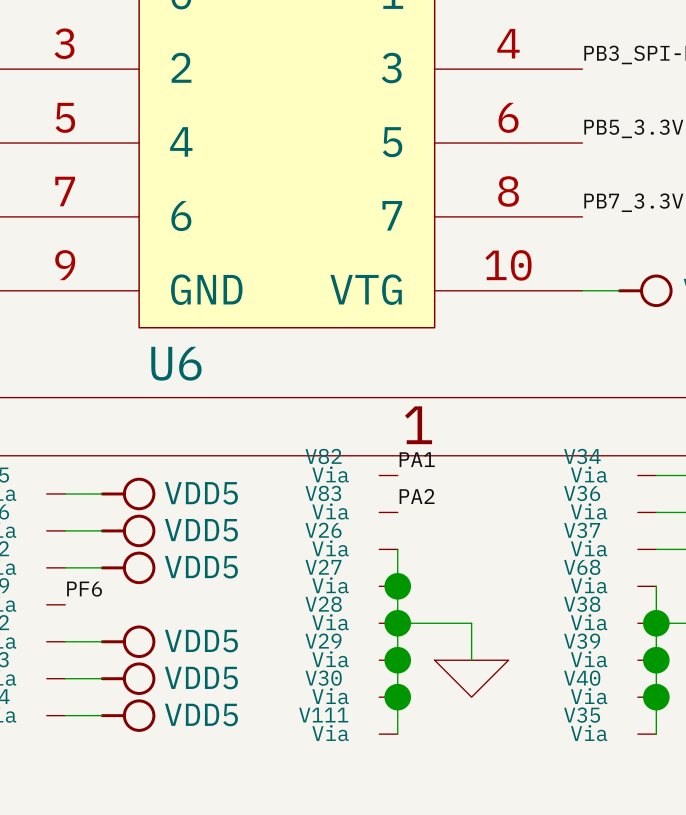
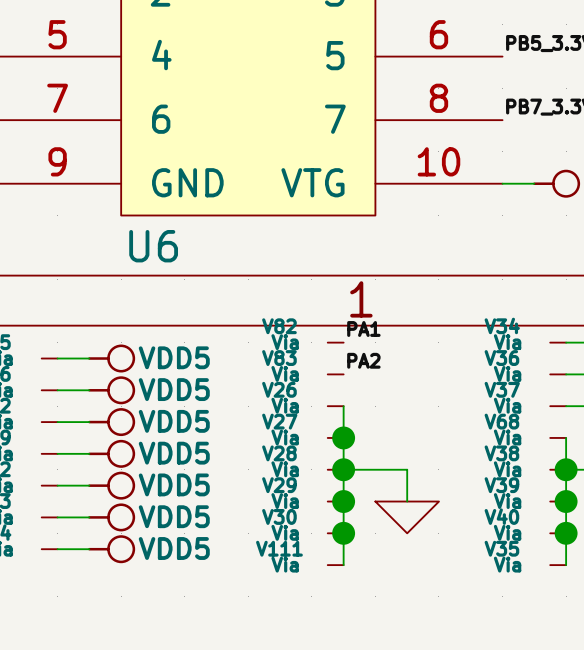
label: PF6 (84, 589) -> none
wire: none -> (57, 453) (89, 453)
power symbol: none -> VDD5 (111, 453)

